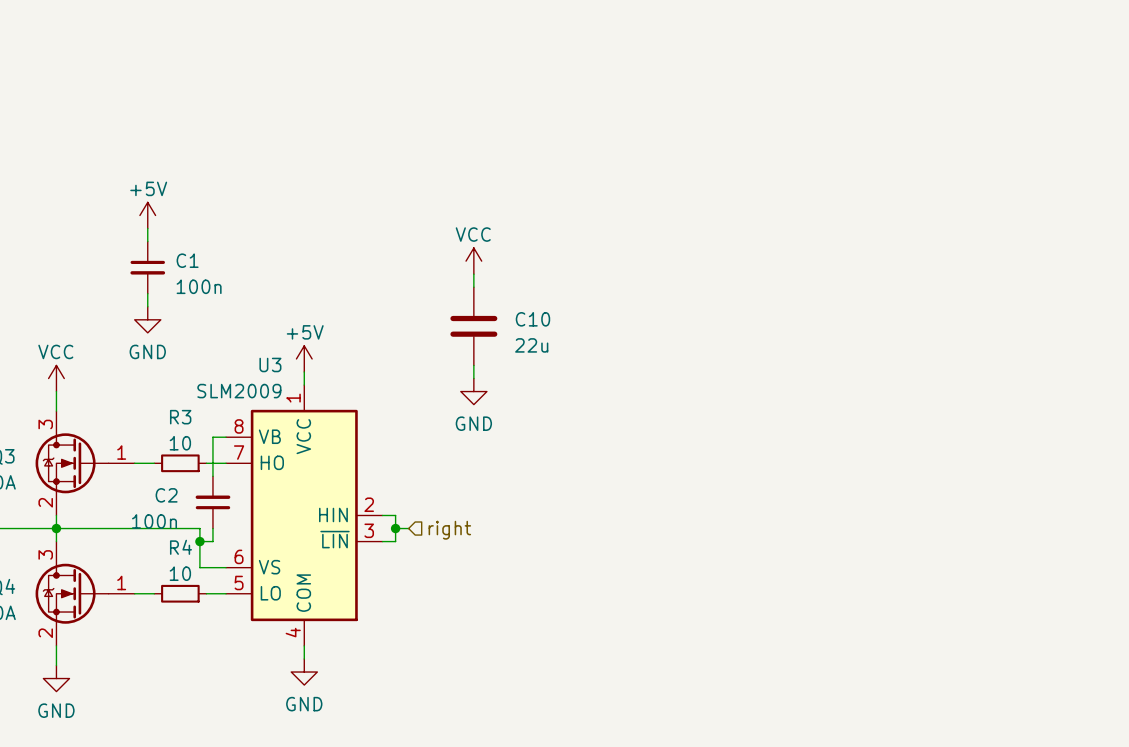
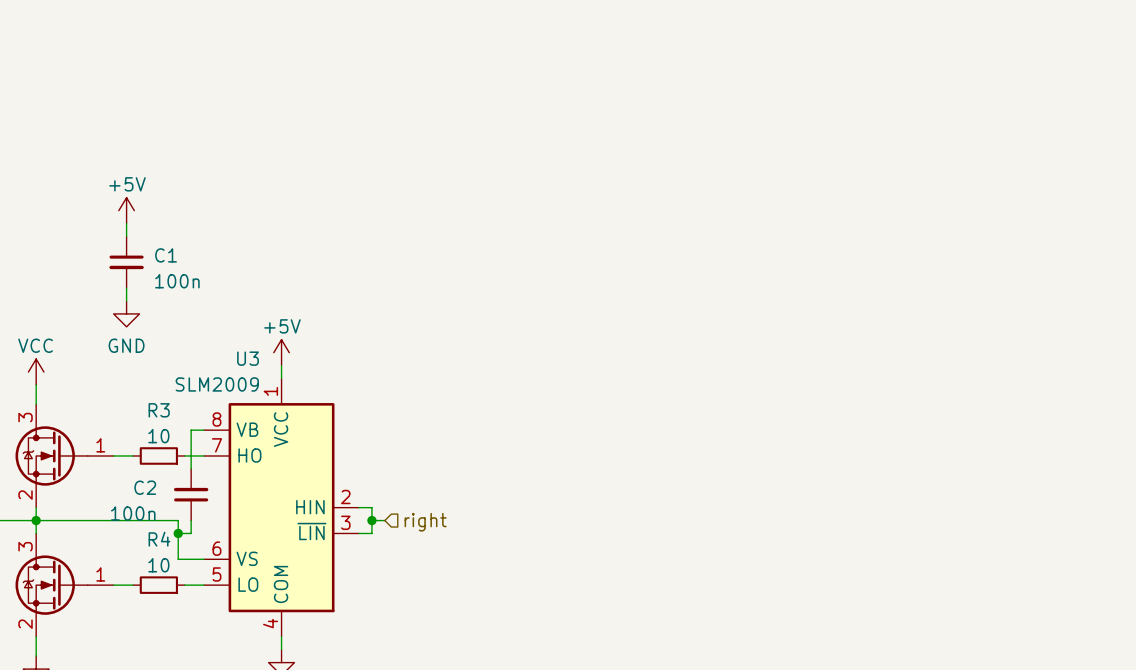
power symbol: VCC (473, 261) -> none
wire: (473, 274) (473, 287) -> none
C10: 22u (473, 326) -> none
wire: (473, 365) (473, 378) -> none
power symbol: GND (473, 391) -> none

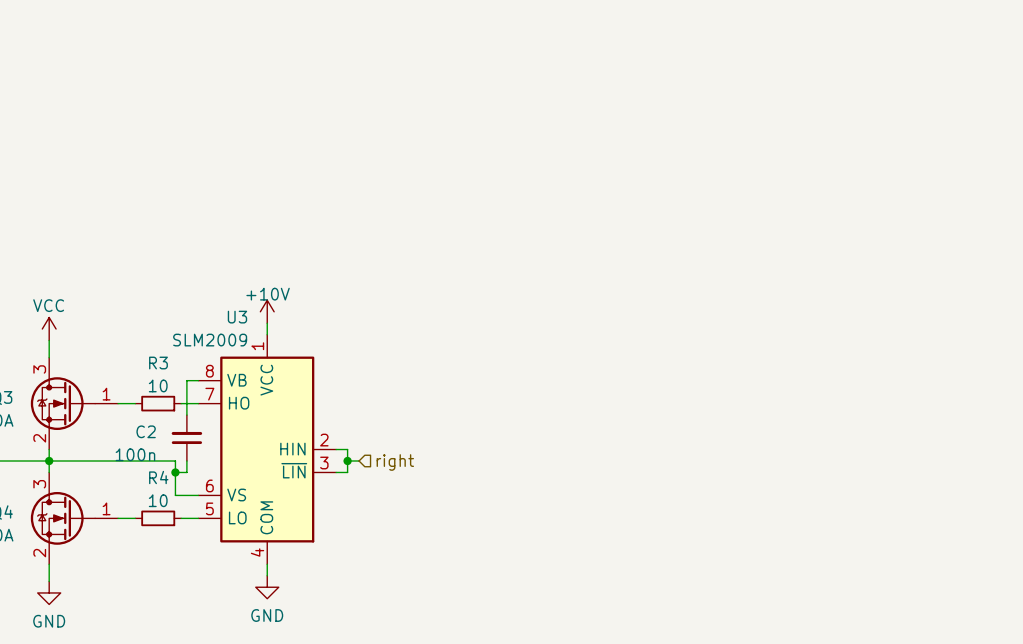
power symbol: +5V (126, 210) -> none
wire: (126, 223) (126, 236) -> none
C1: 100n (126, 262) -> none
wire: (126, 288) (126, 301) -> none
power symbol: GND (126, 313) -> none
power symbol: +5V (281, 352) -> +10V (267, 311)

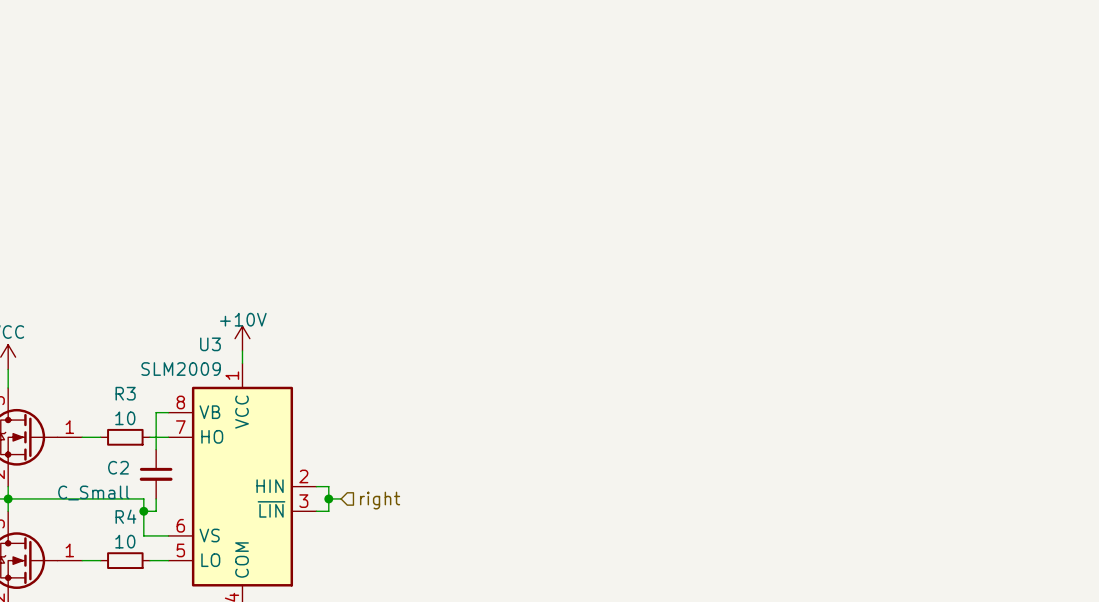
C2 rotation: 0° (186, 437) -> 180° (156, 474)
C2 value: 100n (135, 454) -> C_Small (93, 492)

